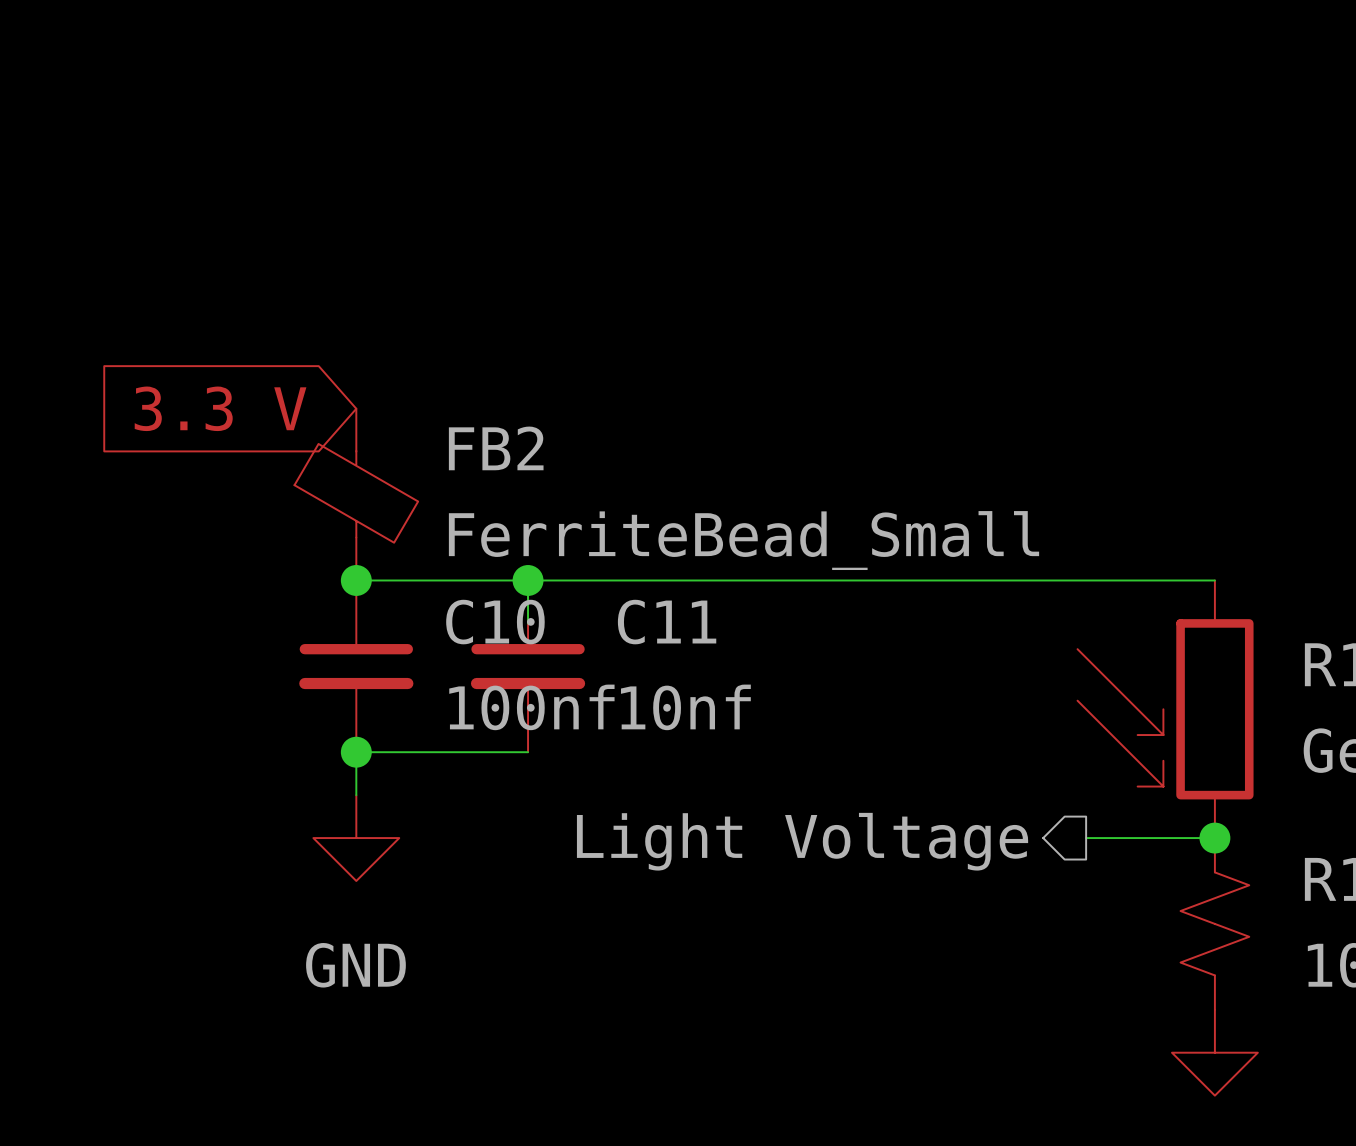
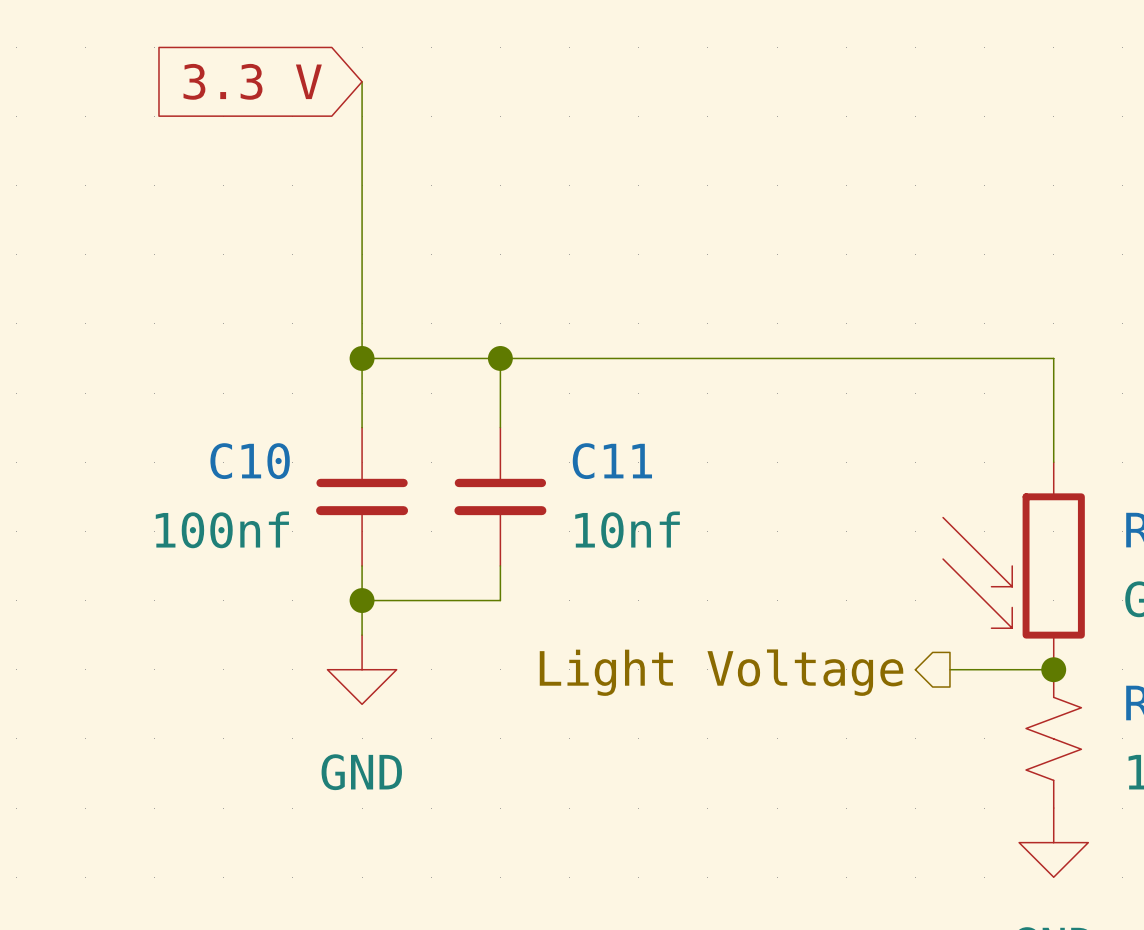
wire: none -> (362, 81) (362, 427)
global label position: 3.3 V (220, 408) -> 3.3 V (252, 81)
junction: none -> (362, 358)
wire: none -> (500, 358) (500, 427)
junction: none -> (500, 358)
FB2: FerriteBead_Small (356, 494) -> none
wire: (356, 580) (1214, 580) -> (362, 358) (1053, 358) (1053, 462)
junction: (356, 580) -> none
junction: (528, 580) -> none
C10 name position: C10 (495, 622) -> C10 (250, 461)
C10 position: (356, 666) -> (362, 496)
C11 position: (528, 666) -> (500, 496)
C10 value position: 100nf (531, 707) -> 100nf (222, 529)

